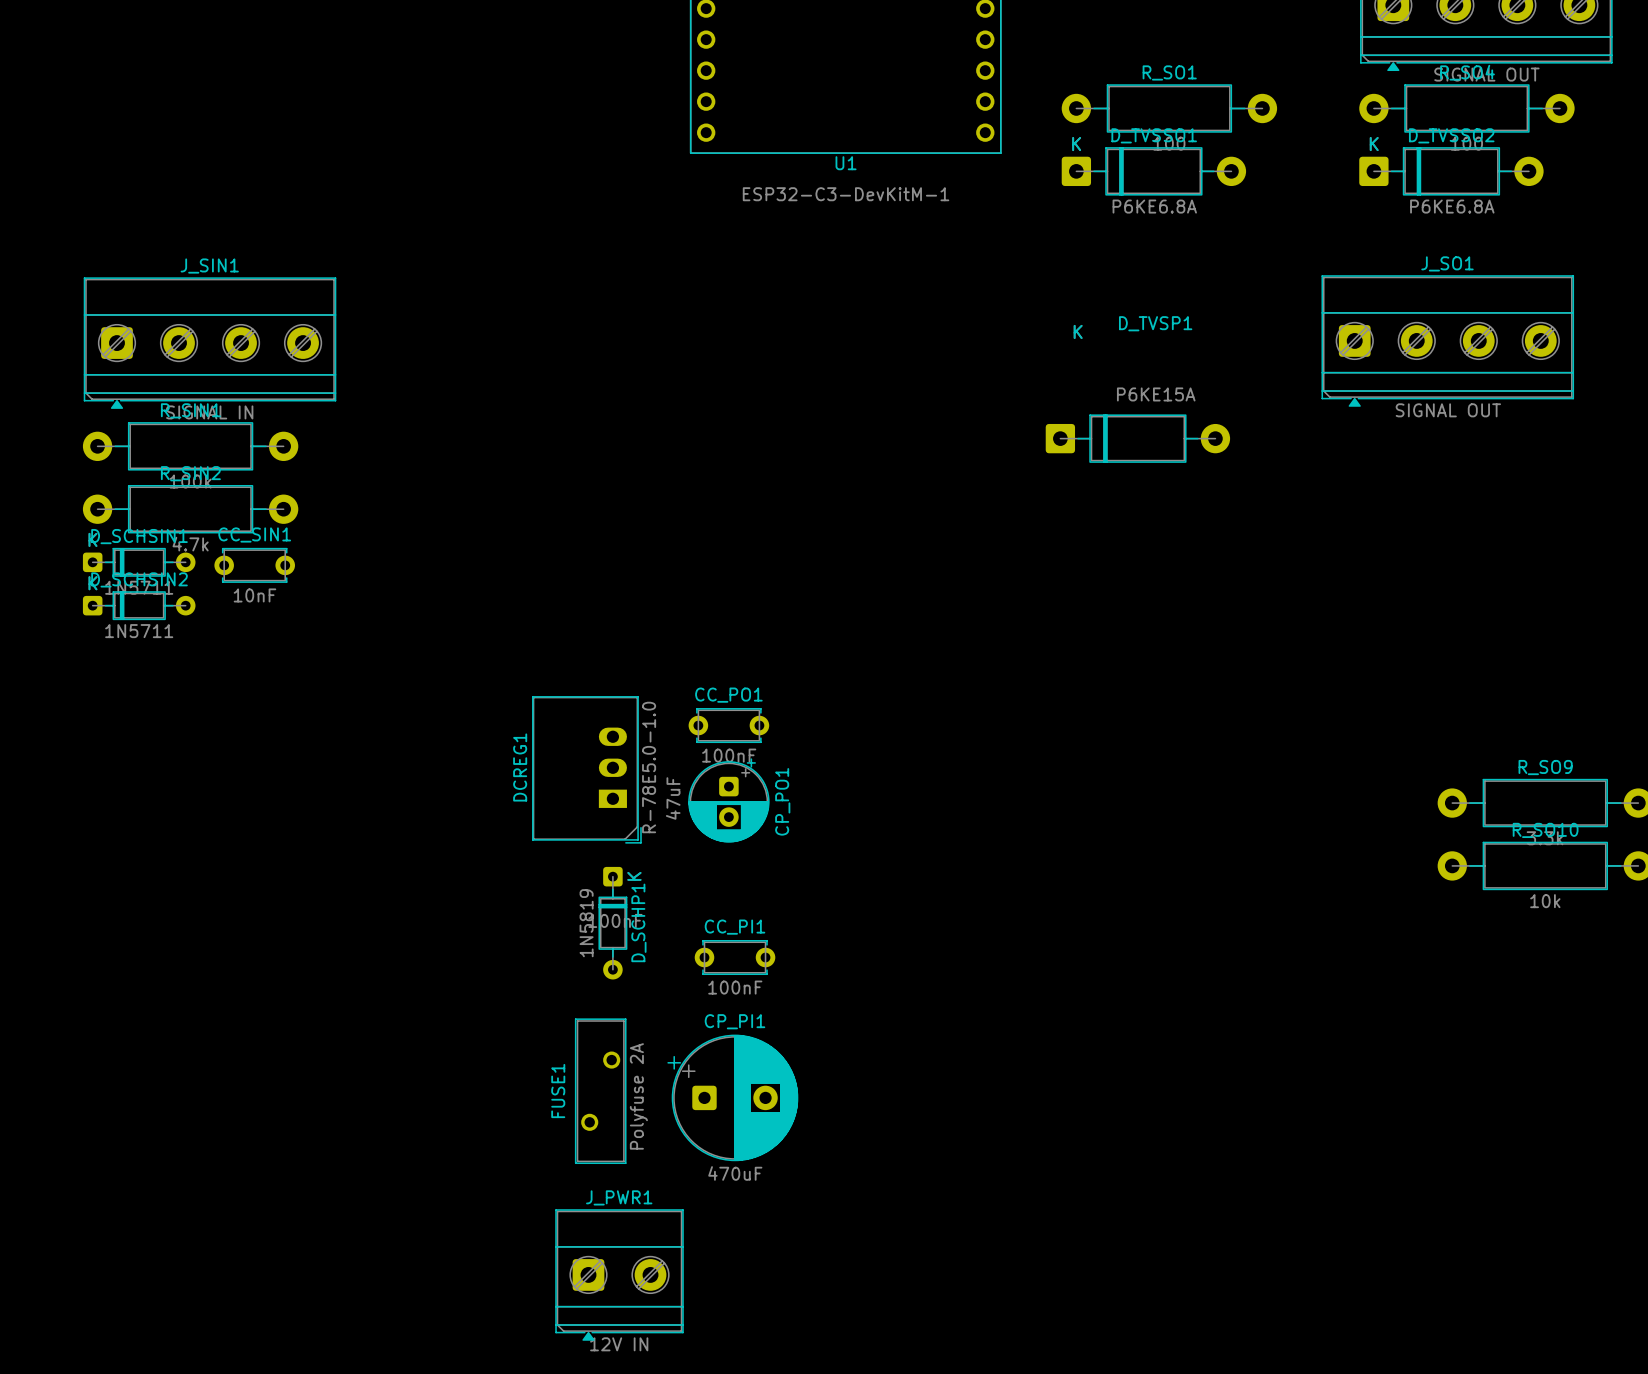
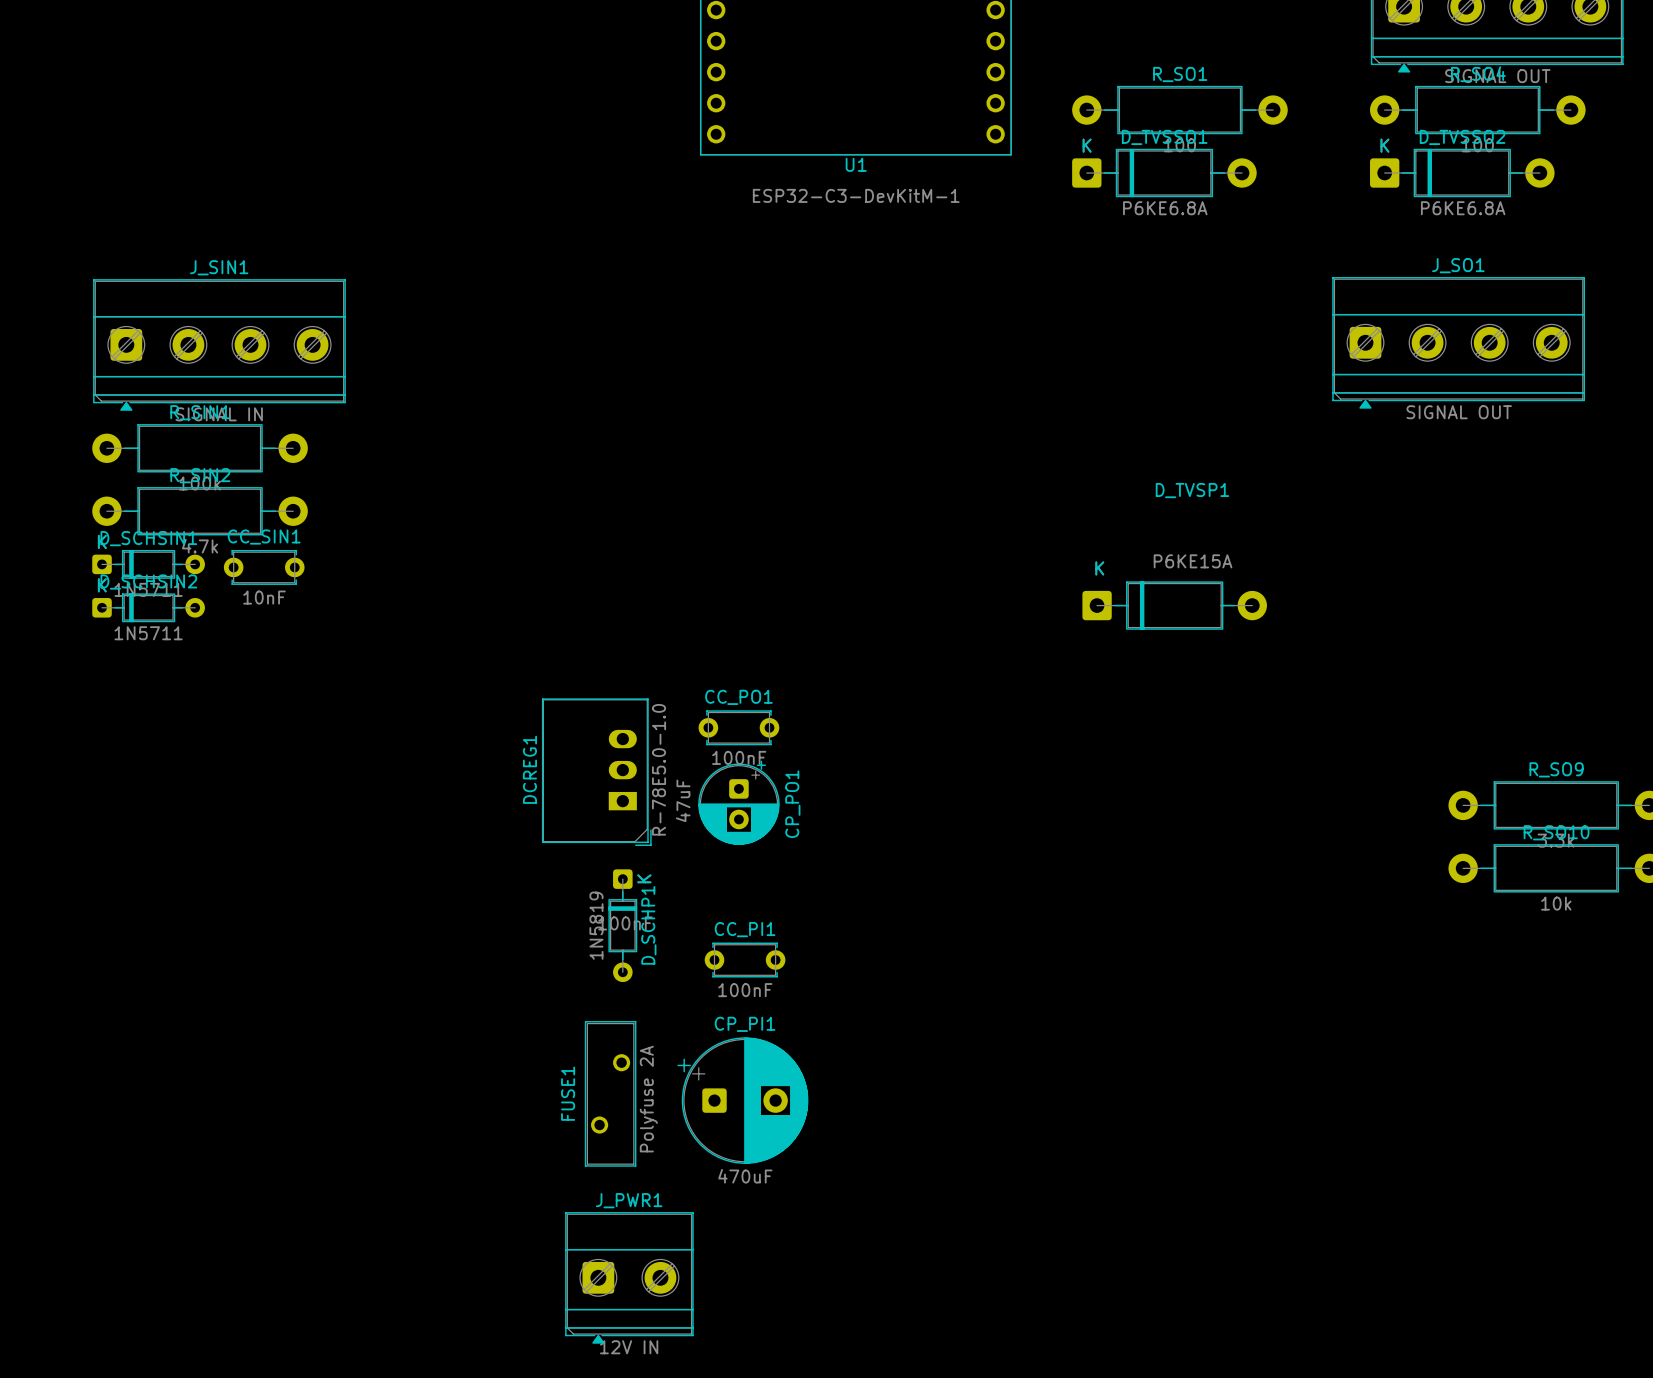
D_TVSP1 footprint: [1045, 414, 1231, 463] -> [1082, 581, 1267, 630]

